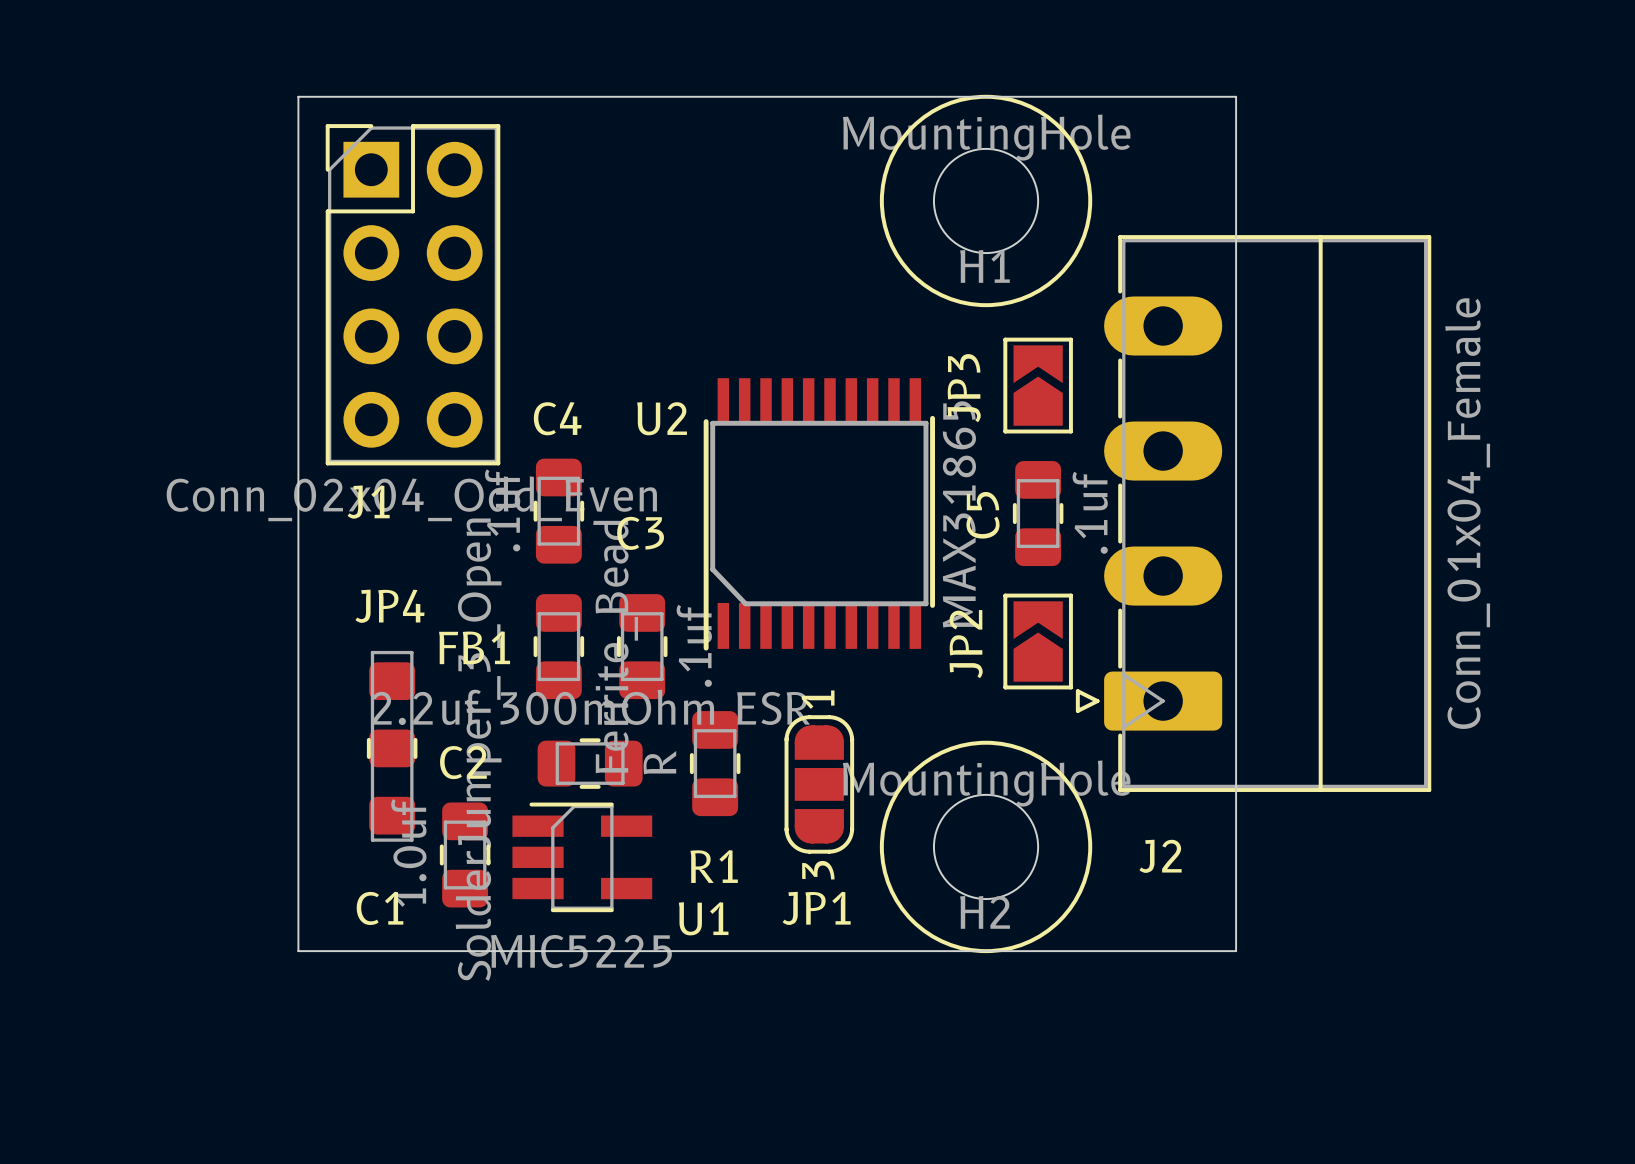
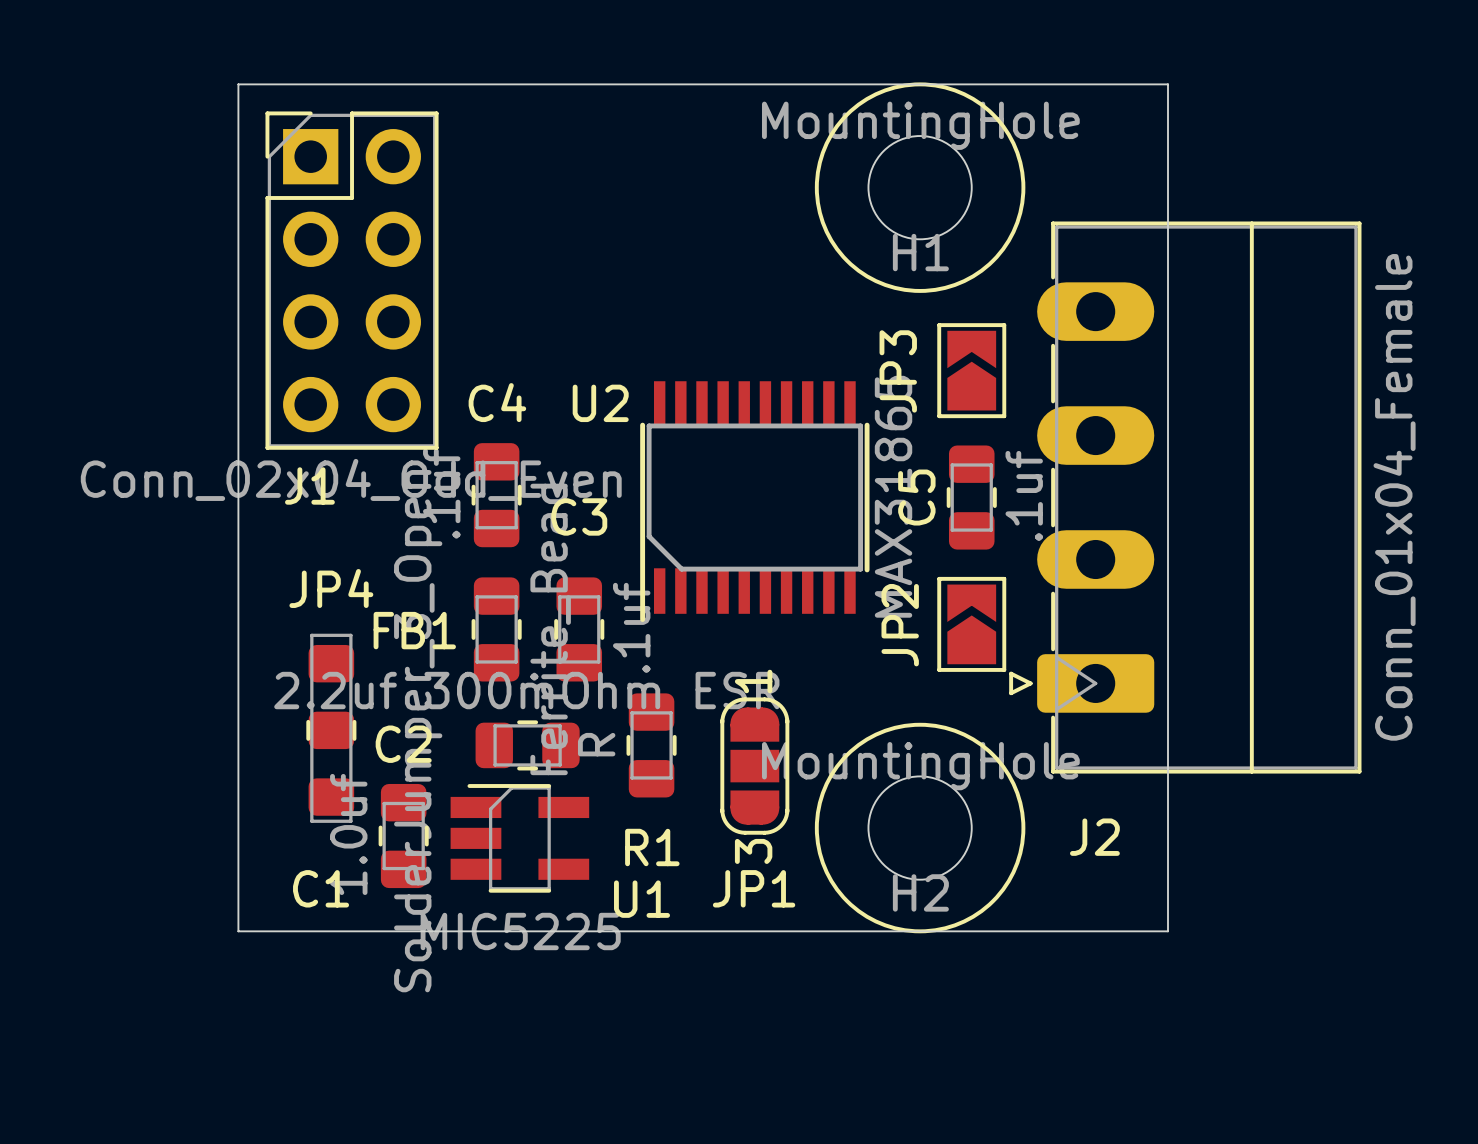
U2 footprint: [703, 378, 936, 651] -> [640, 381, 870, 622]

